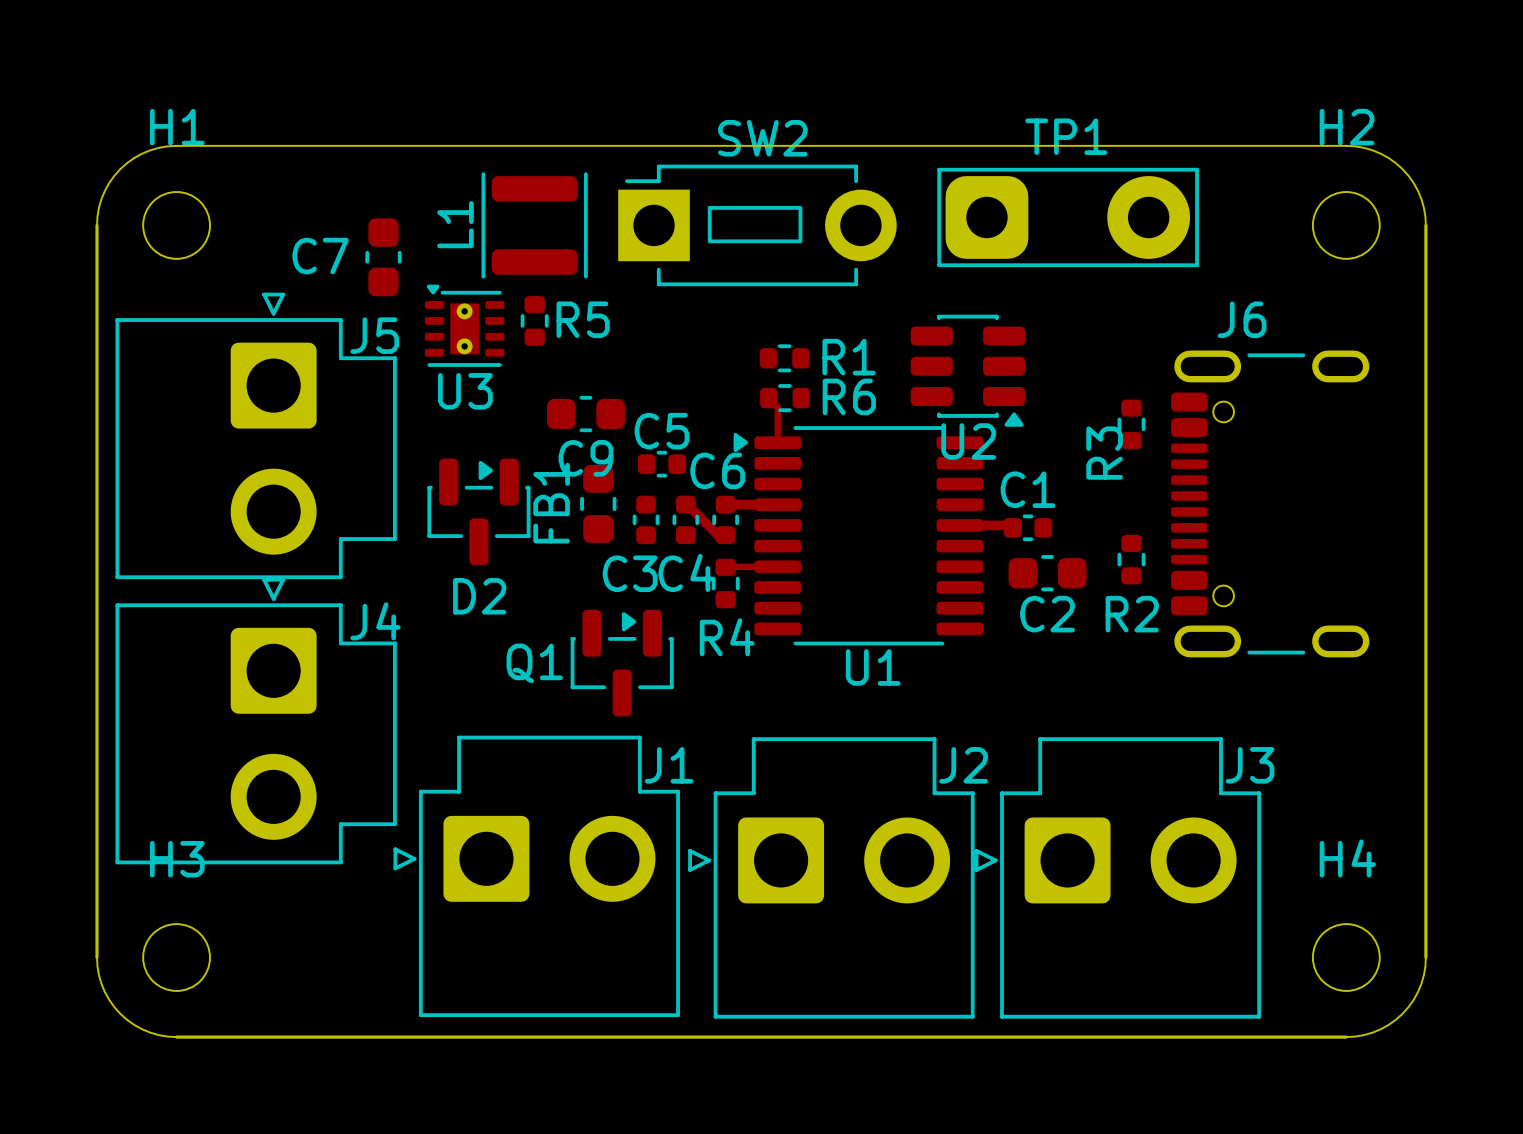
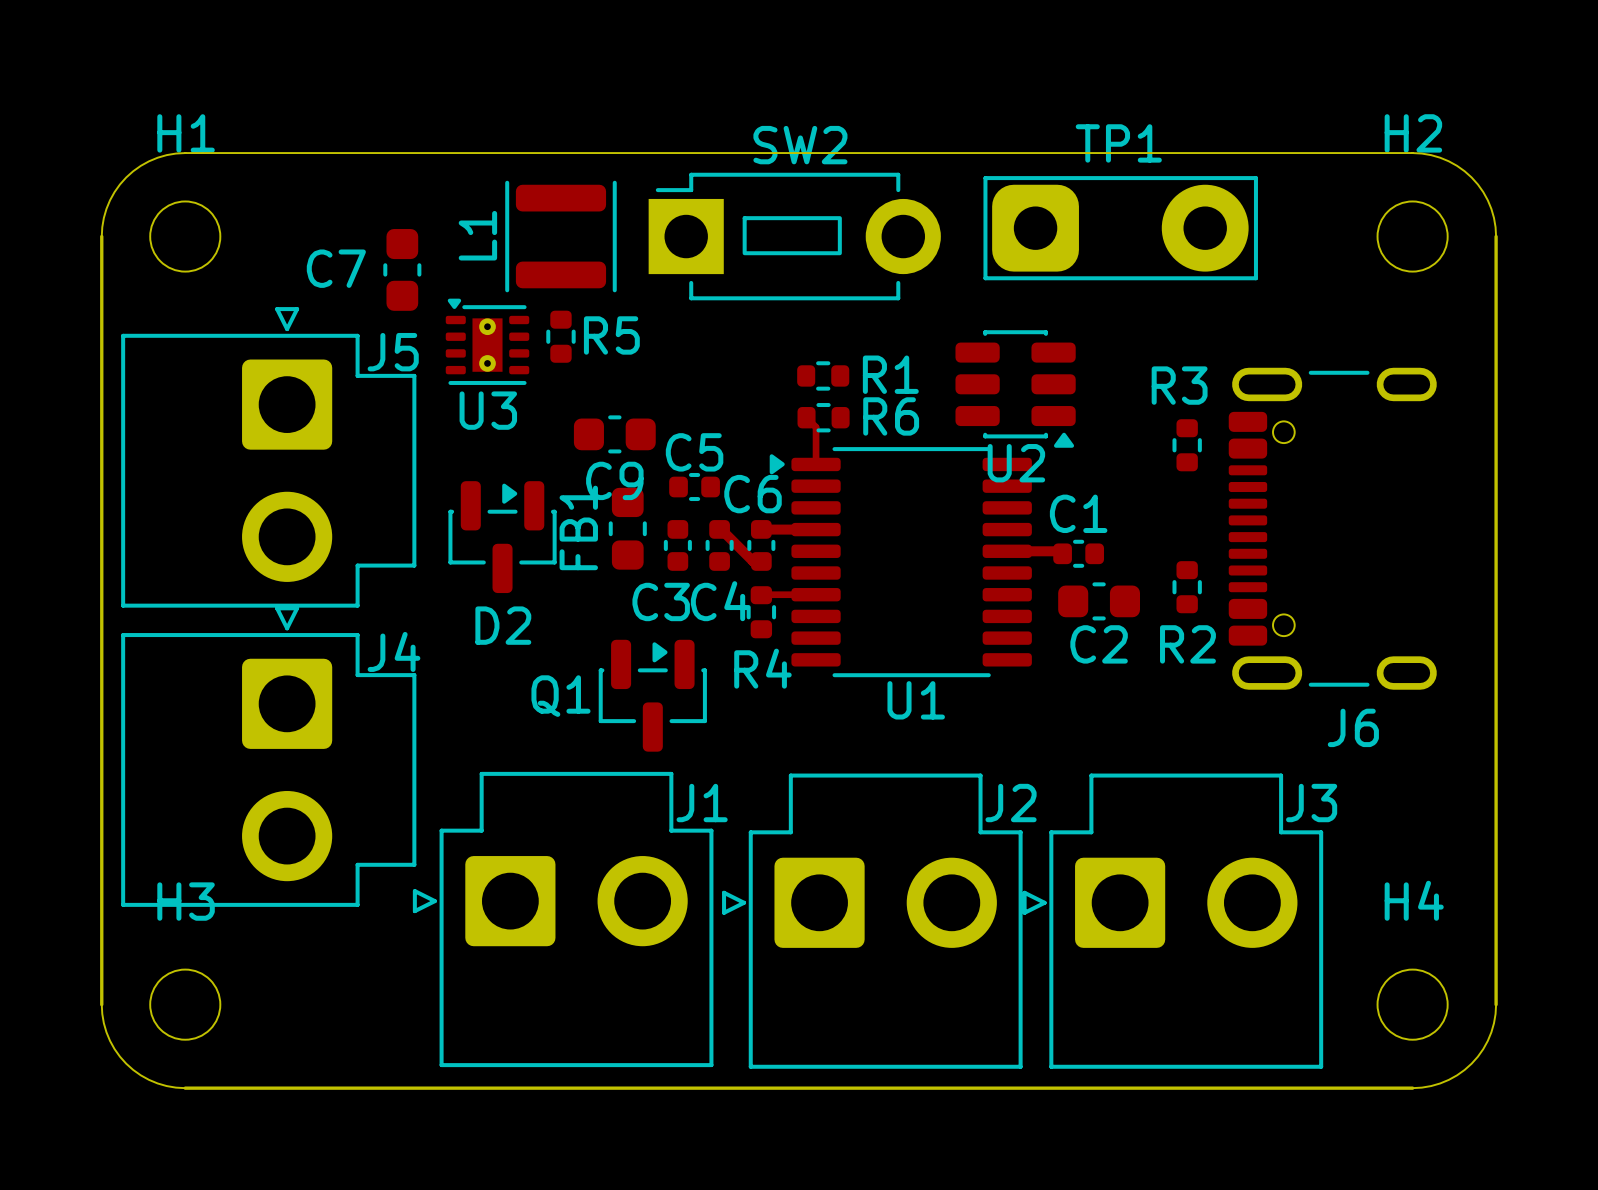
J6 name position: J6 (1242, 319) -> J6 (1353, 727)
R3 name rotation: 0° (1104, 453) -> 90° clockwise (1179, 385)
R3 name position: R3 (1104, 453) -> R3 (1179, 385)

